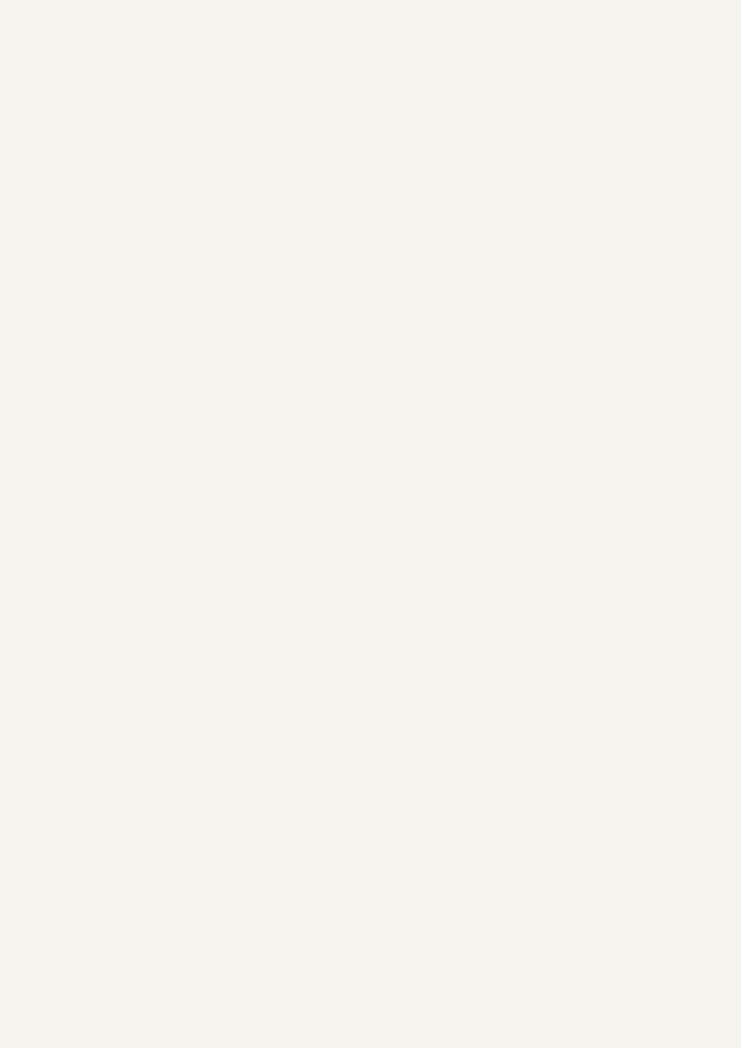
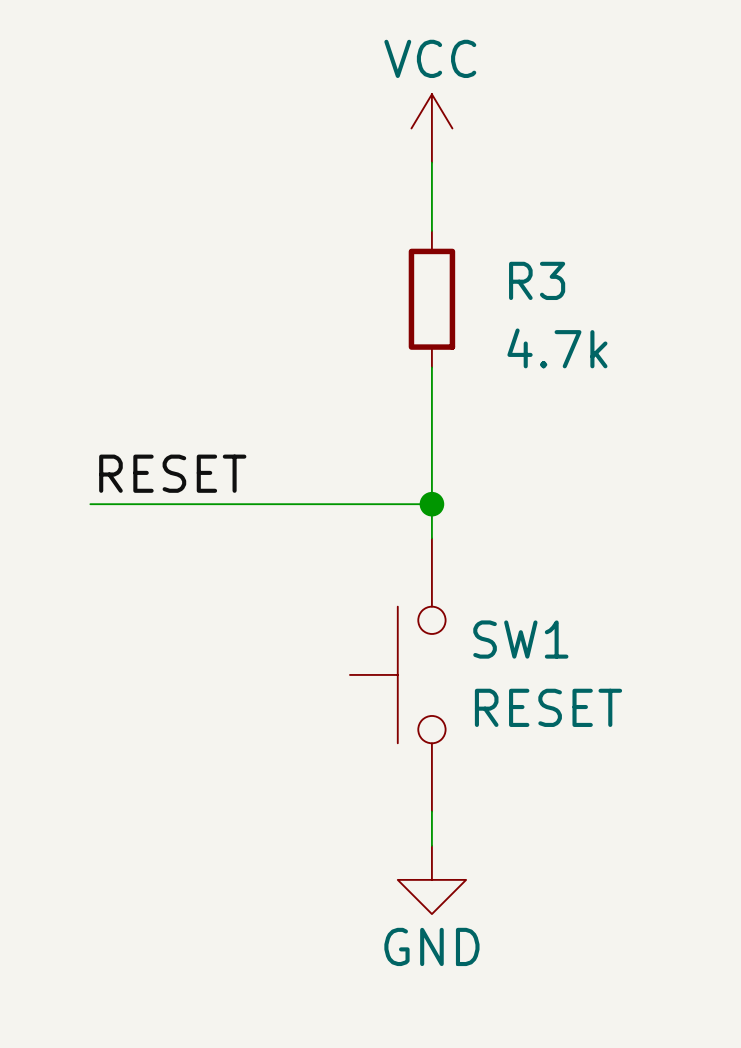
power symbol: none -> VCC (431, 128)
wire: none -> (431, 162) (431, 230)
R3: none -> 4.7k (431, 299)
wire: none -> (431, 367) (431, 538)
label: none -> RESET (172, 473)
wire: none -> (90, 504) (431, 504)
junction: none -> (431, 504)
SW1: none -> RESET (397, 674)
wire: none -> (431, 811) (431, 845)
power symbol: none -> GND (431, 879)

